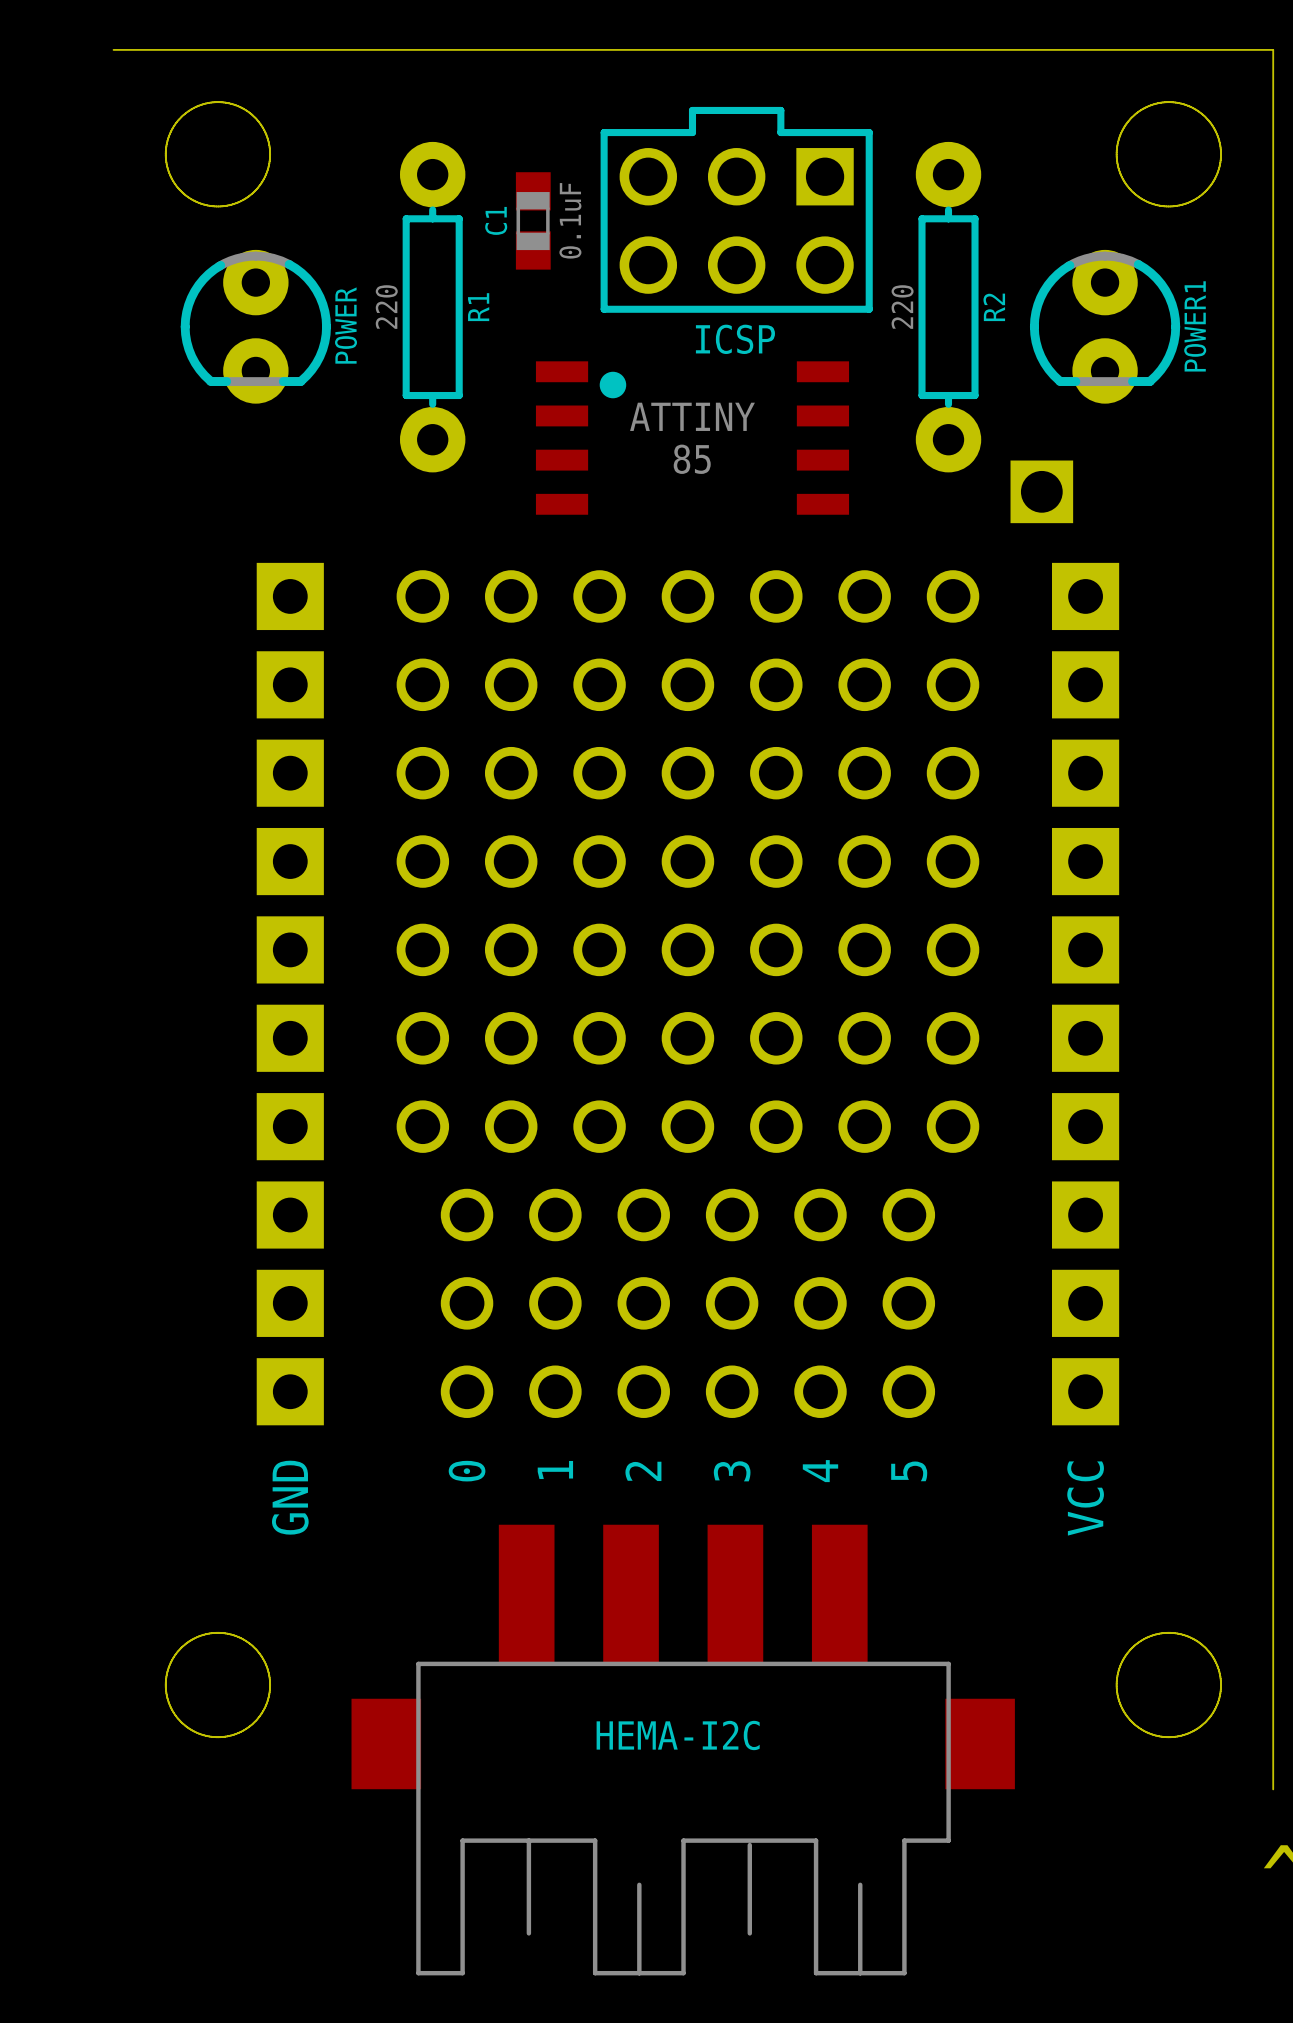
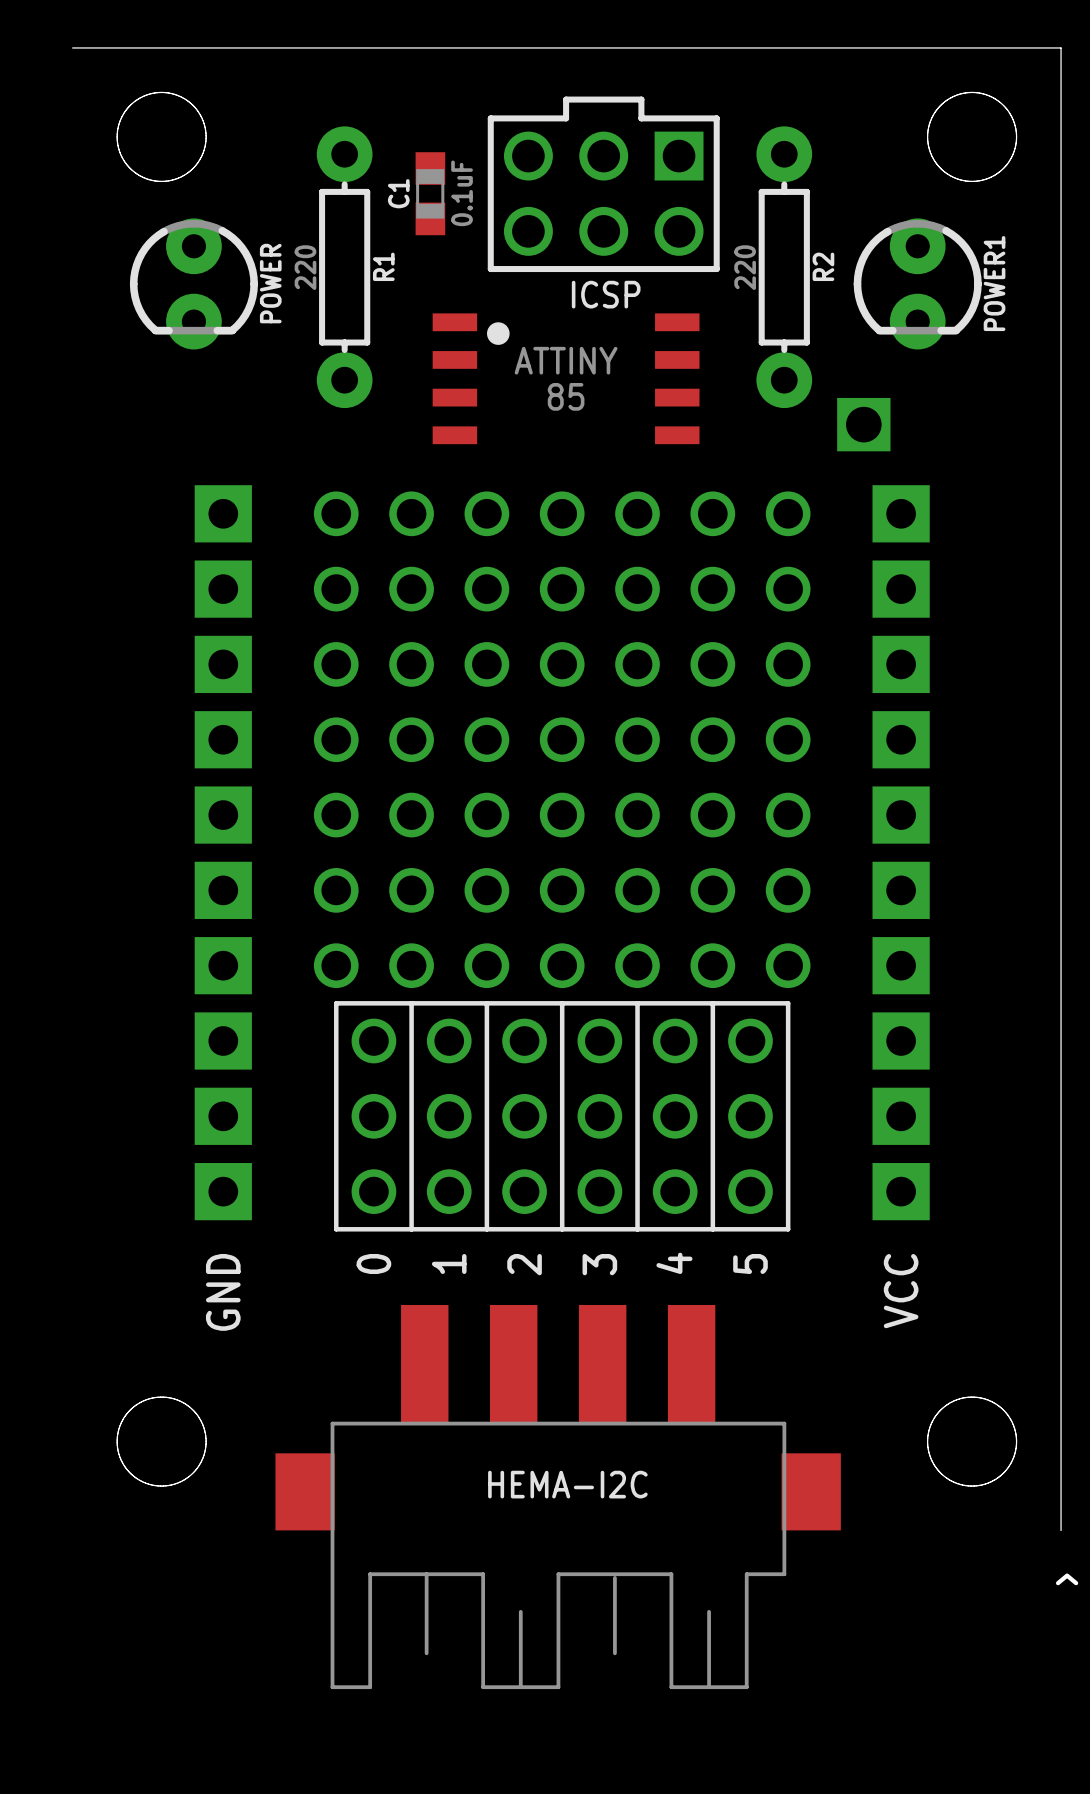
line: none -> (336, 1003) (788, 1003) (788, 1229) (336, 1229) (336, 1003)
line: none -> (411, 1003) (411, 1229)
line: none -> (486, 1003) (486, 1229)
line: none -> (562, 1003) (562, 1229)
line: none -> (637, 1003) (637, 1229)
line: none -> (712, 1003) (712, 1229)

